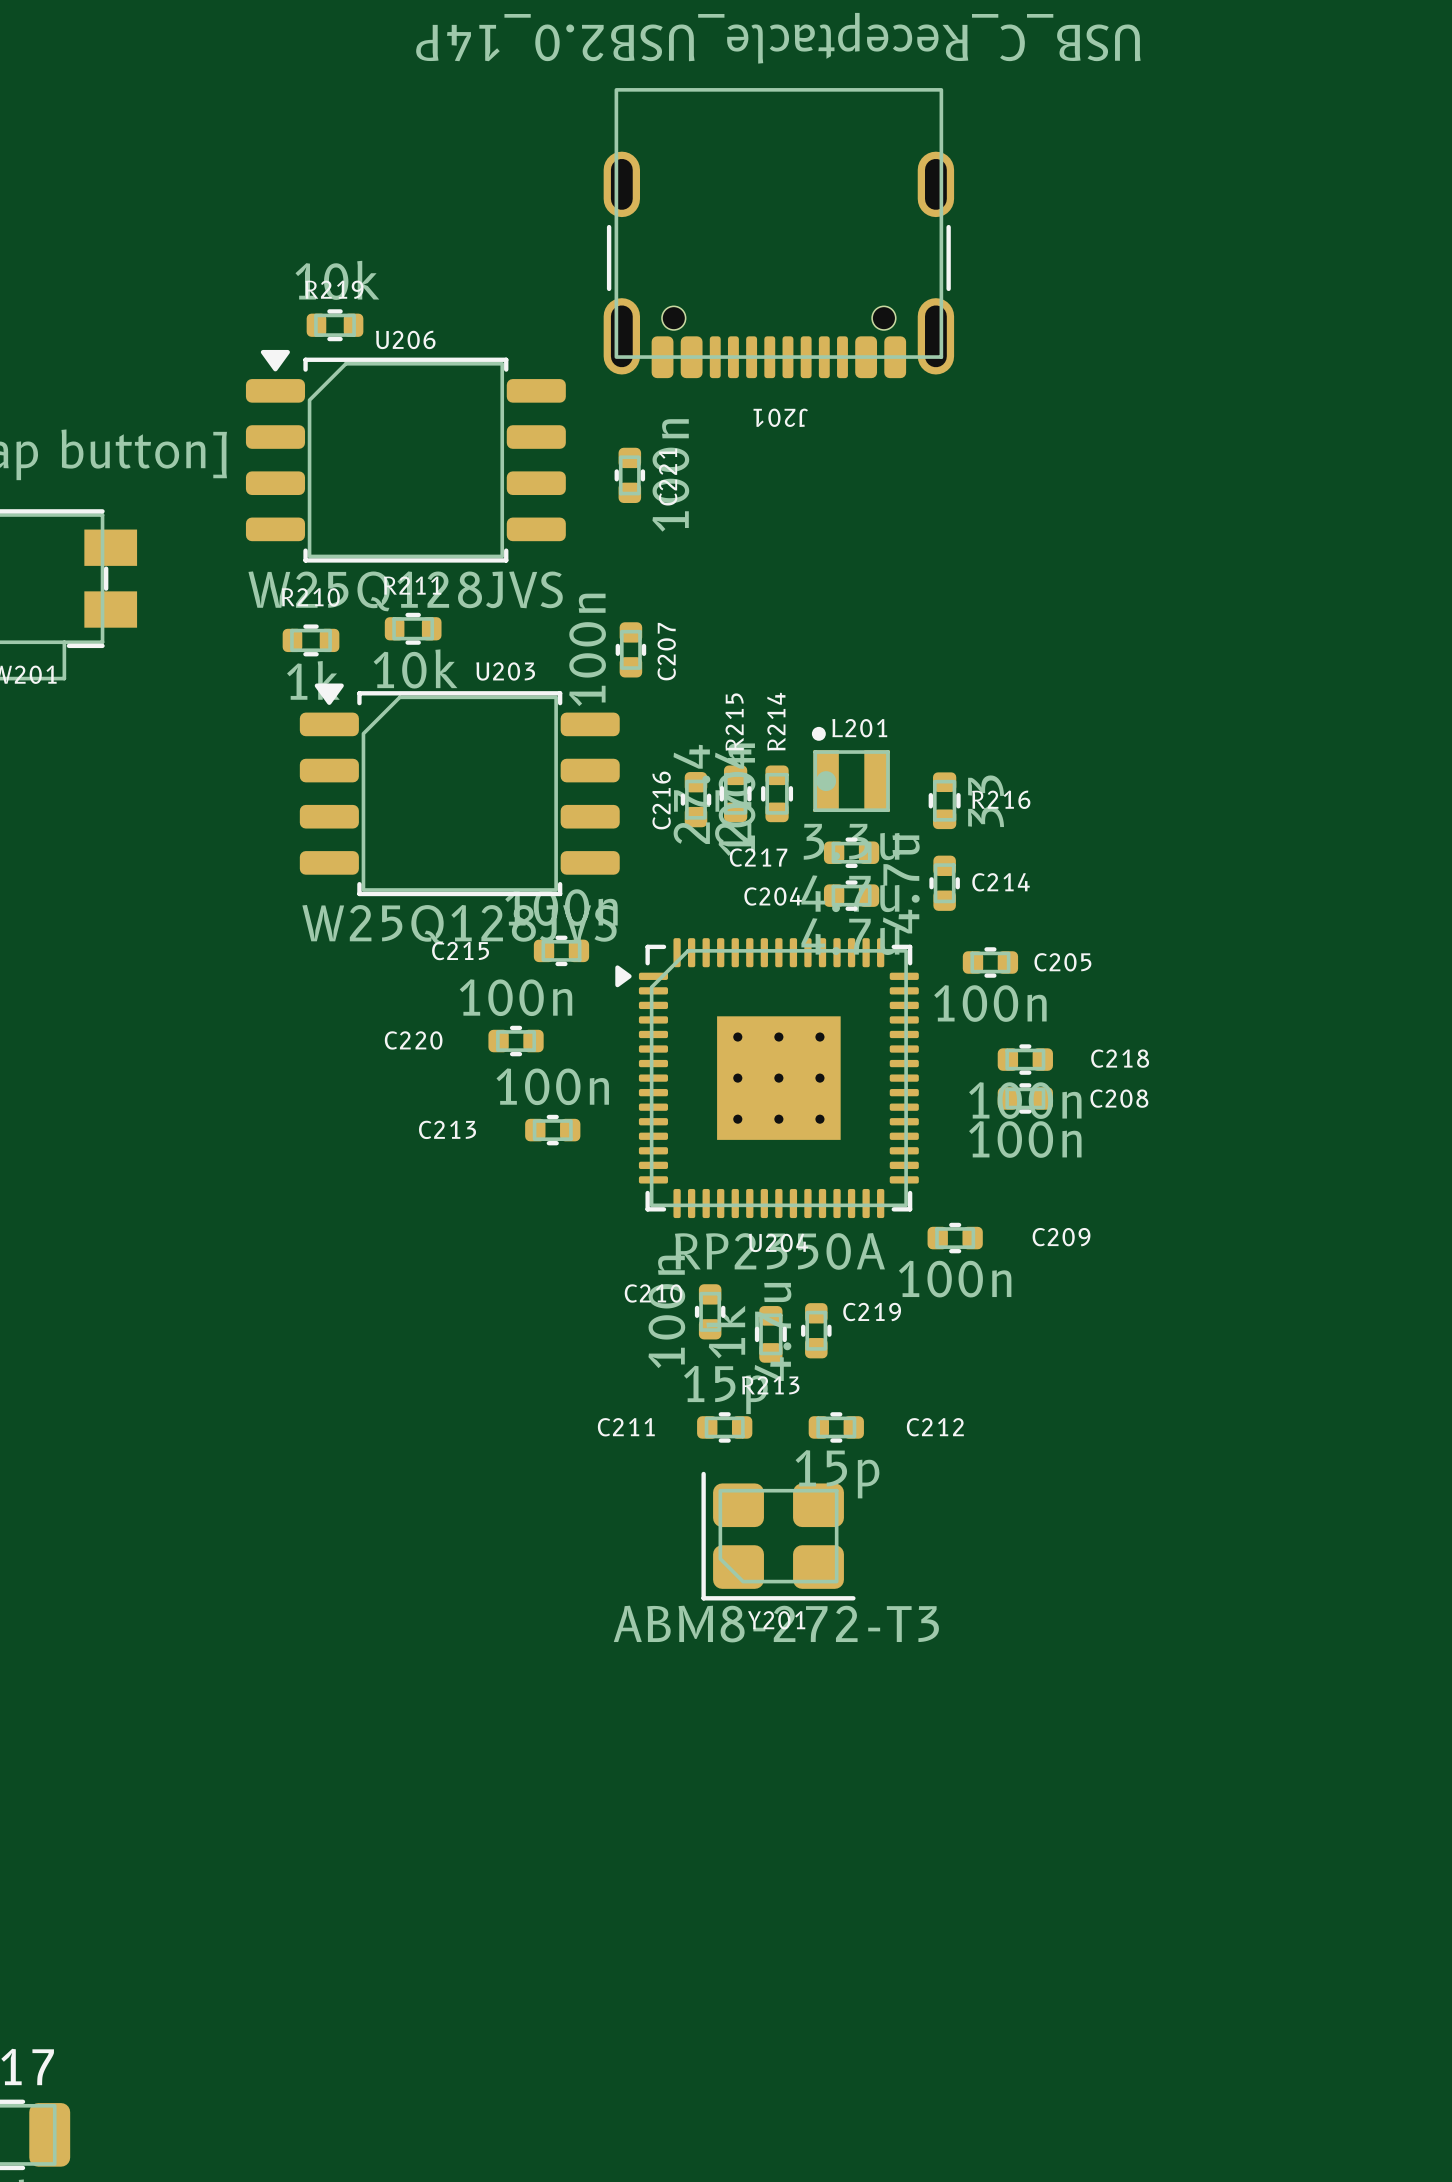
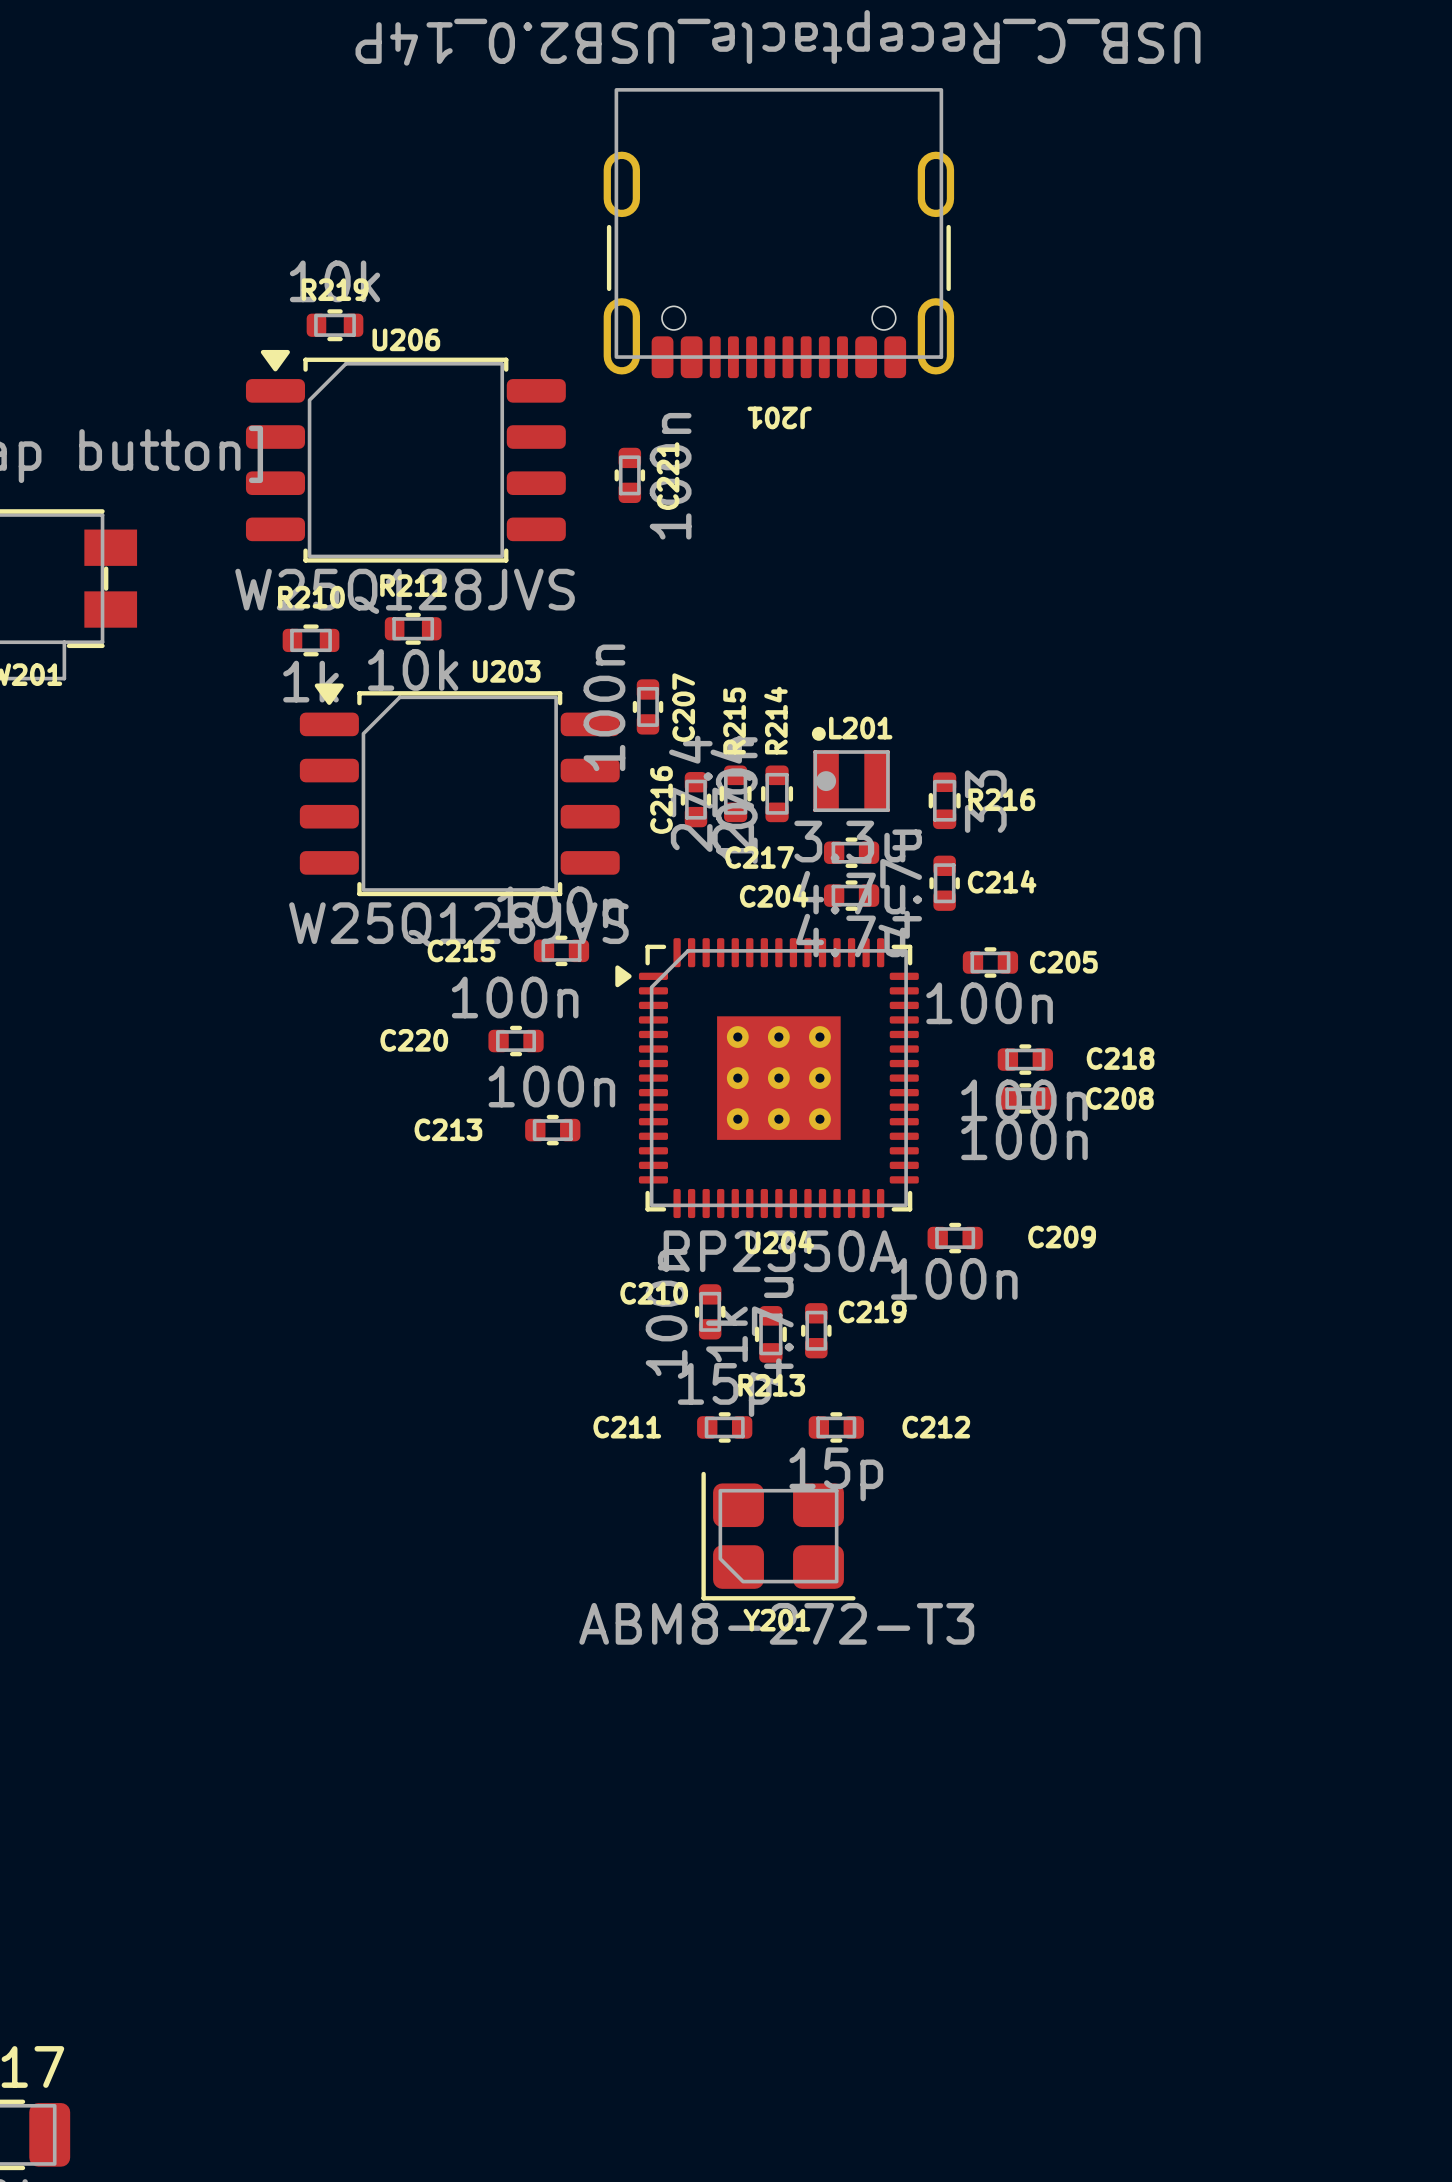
C207 position: (630, 649) -> (648, 706)

